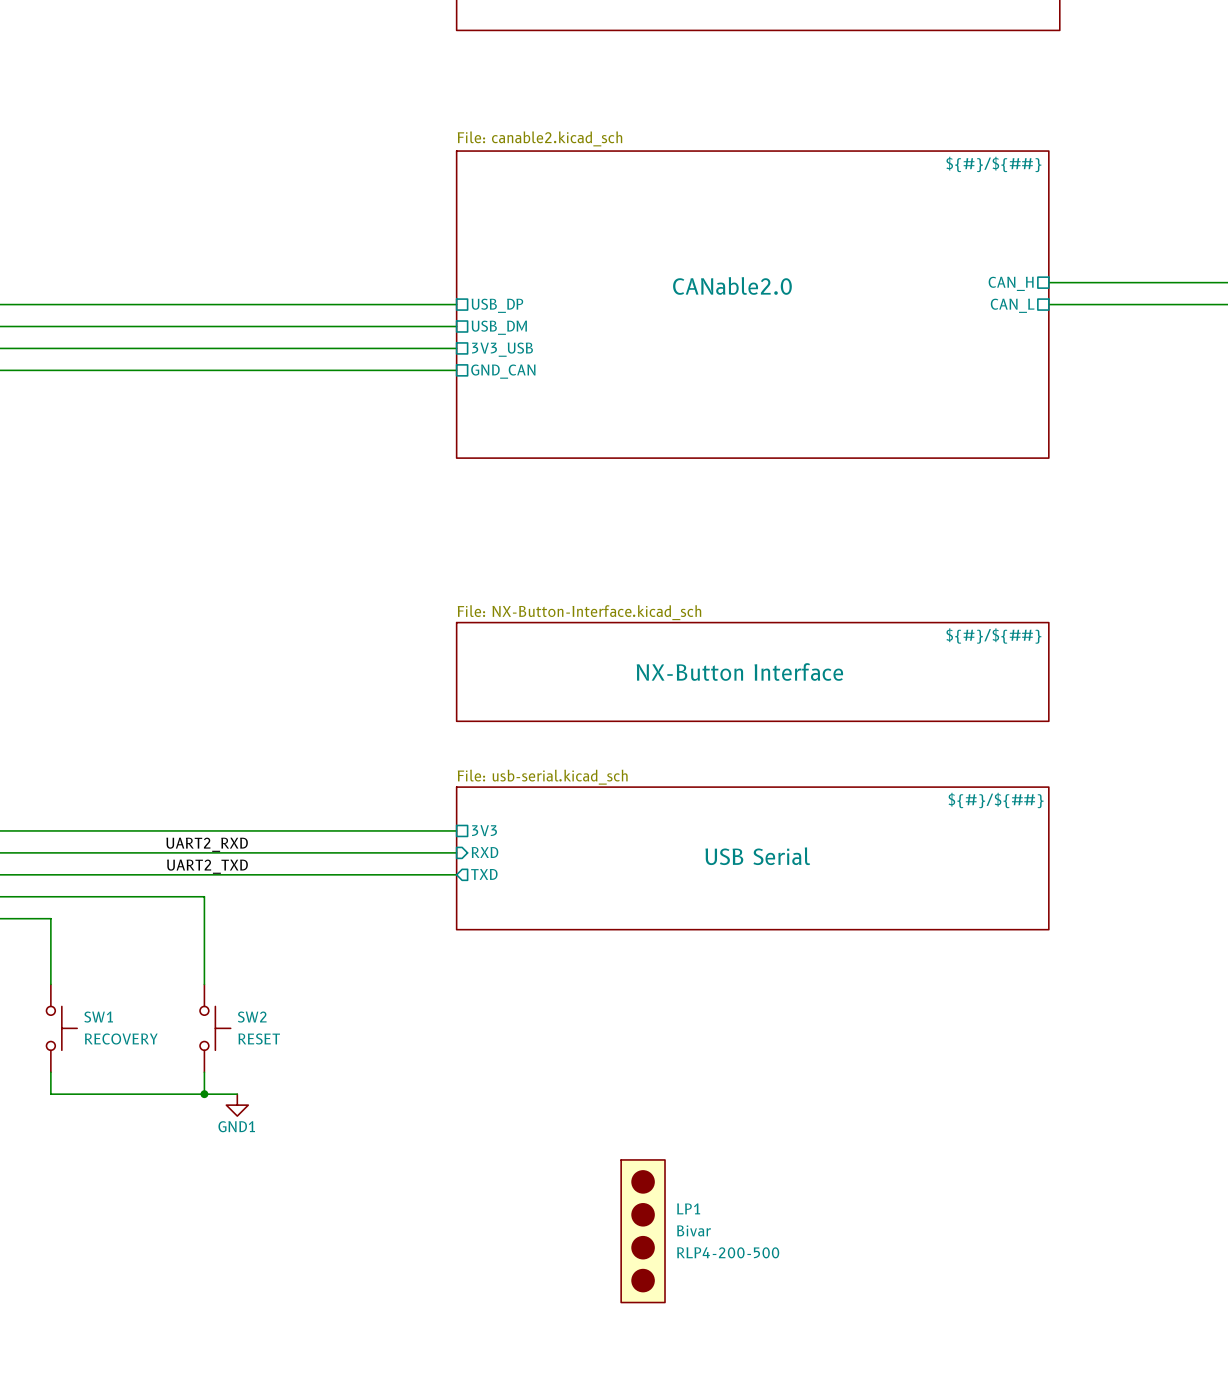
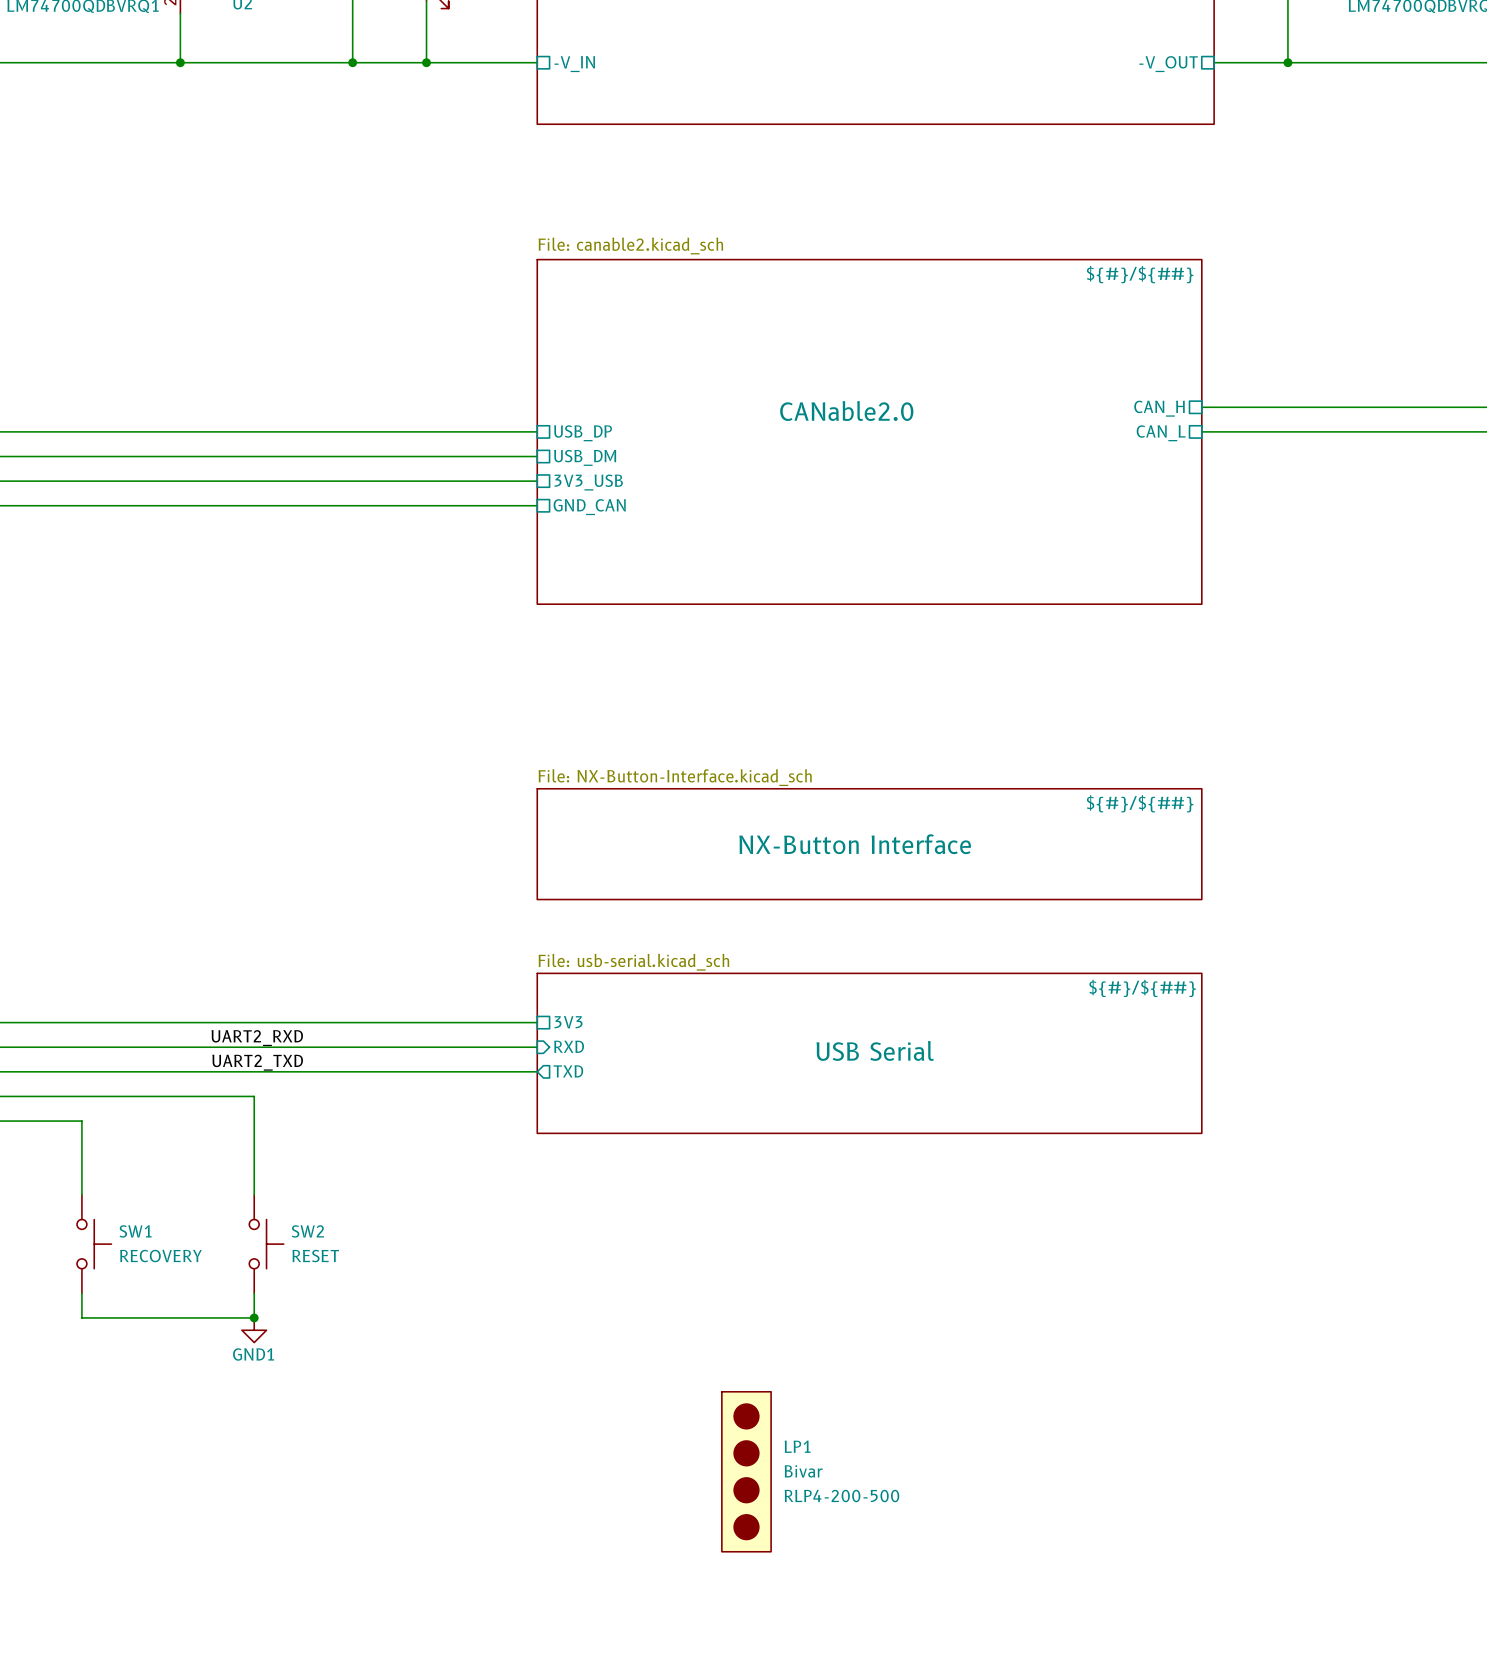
wire: (204, 1094) (237, 1094) -> none
power symbol position: GND1 (237, 1105) -> GND1 (254, 1330)

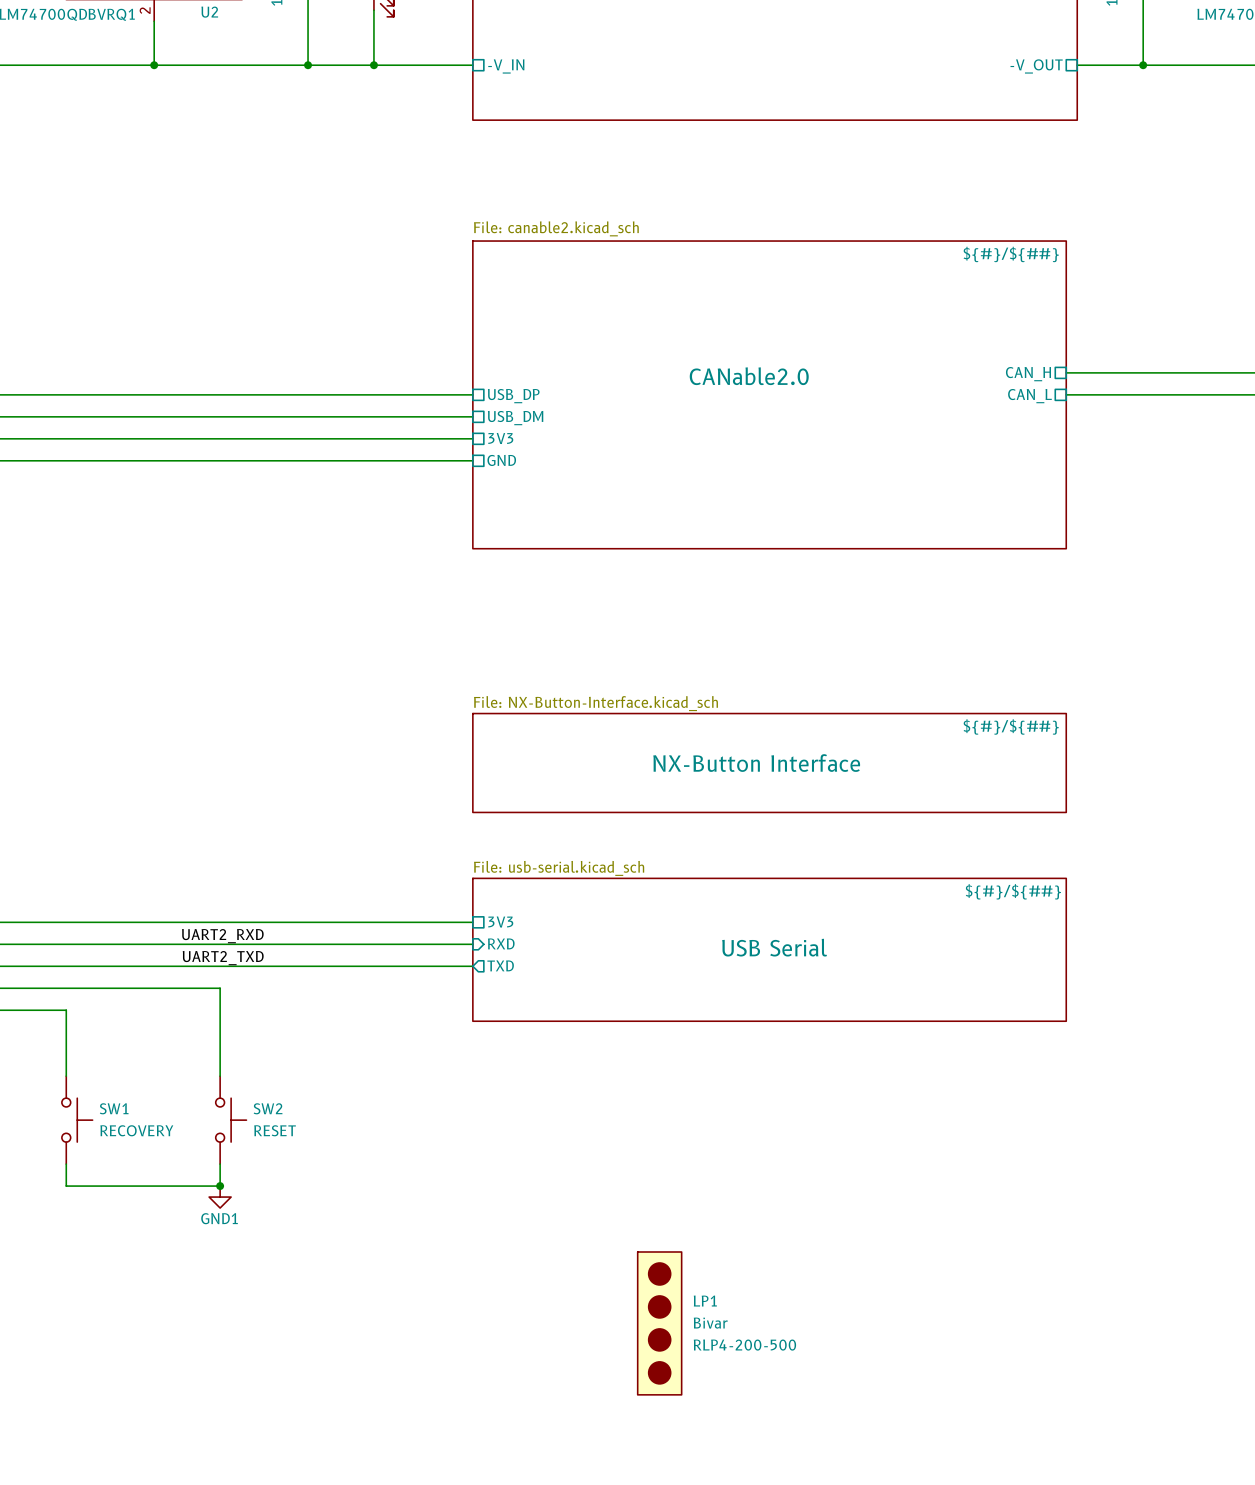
sheet pin: 3V3_USB (588, 482) -> 3V3 (500, 438)
sheet pin: GND_CAN (589, 507) -> GND (501, 460)

